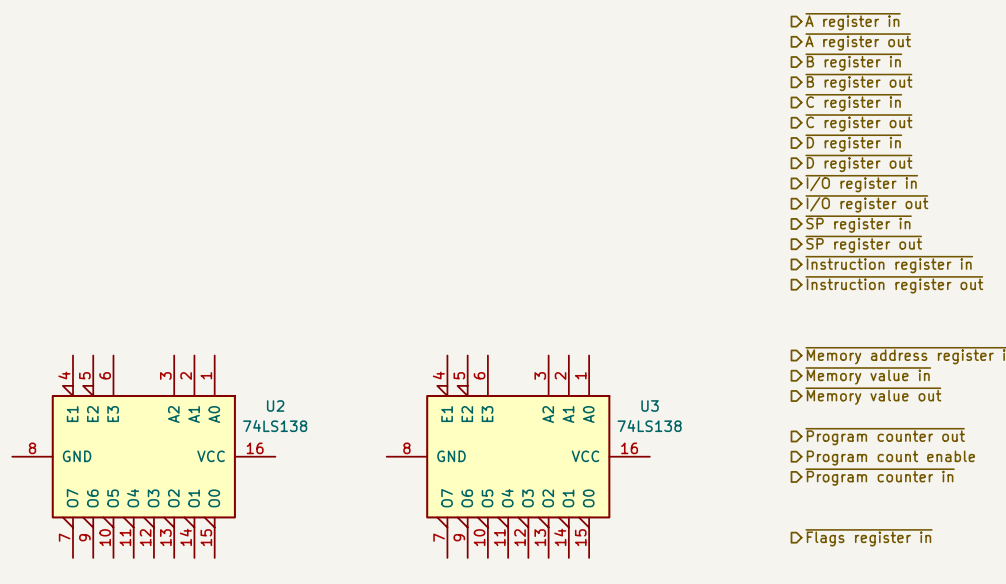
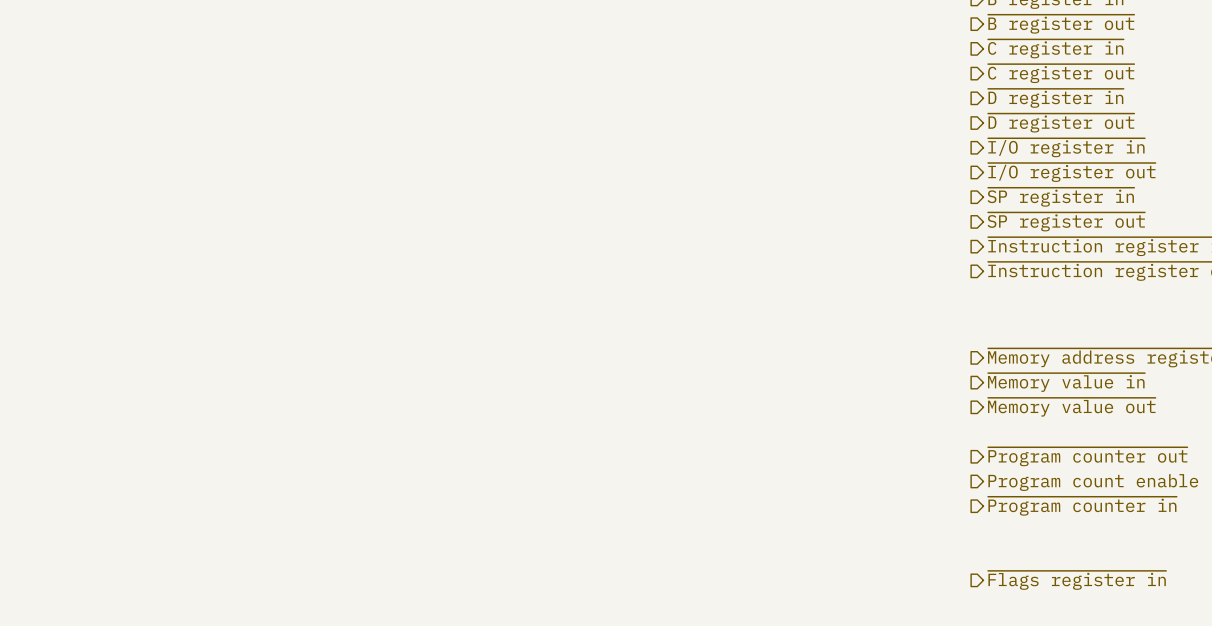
U2: 74LS138 (143, 456) -> none
U3: 74LS138 (518, 456) -> none

